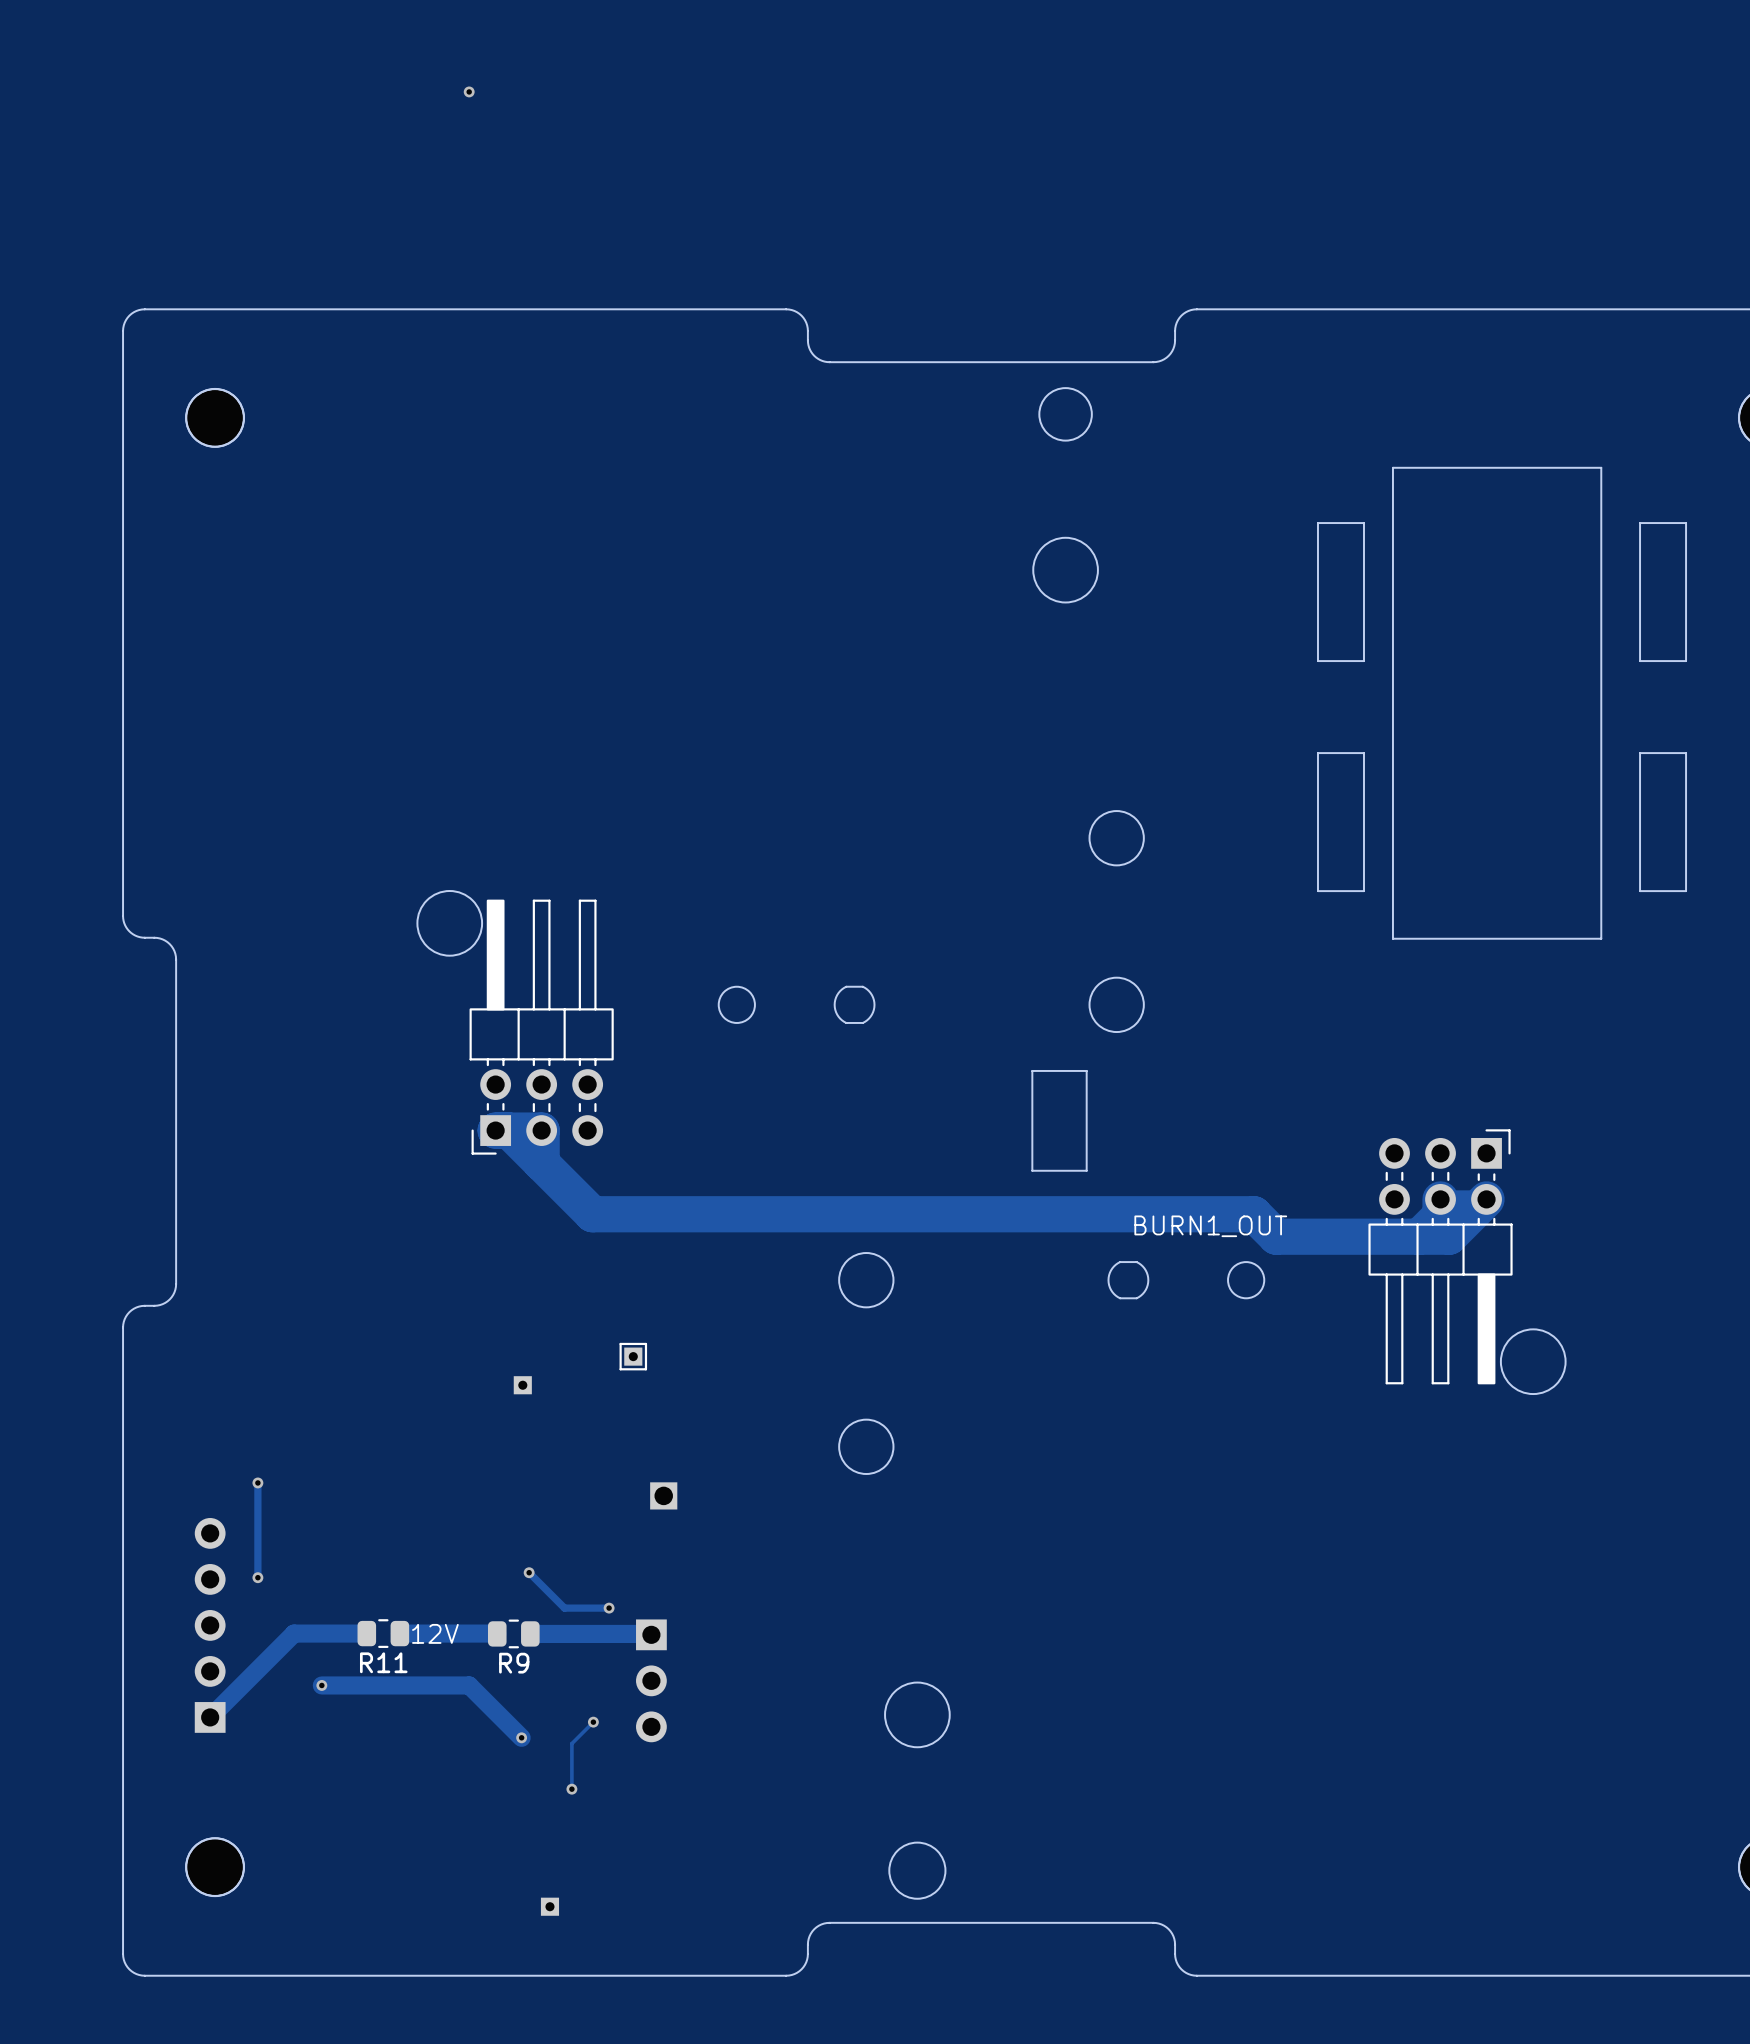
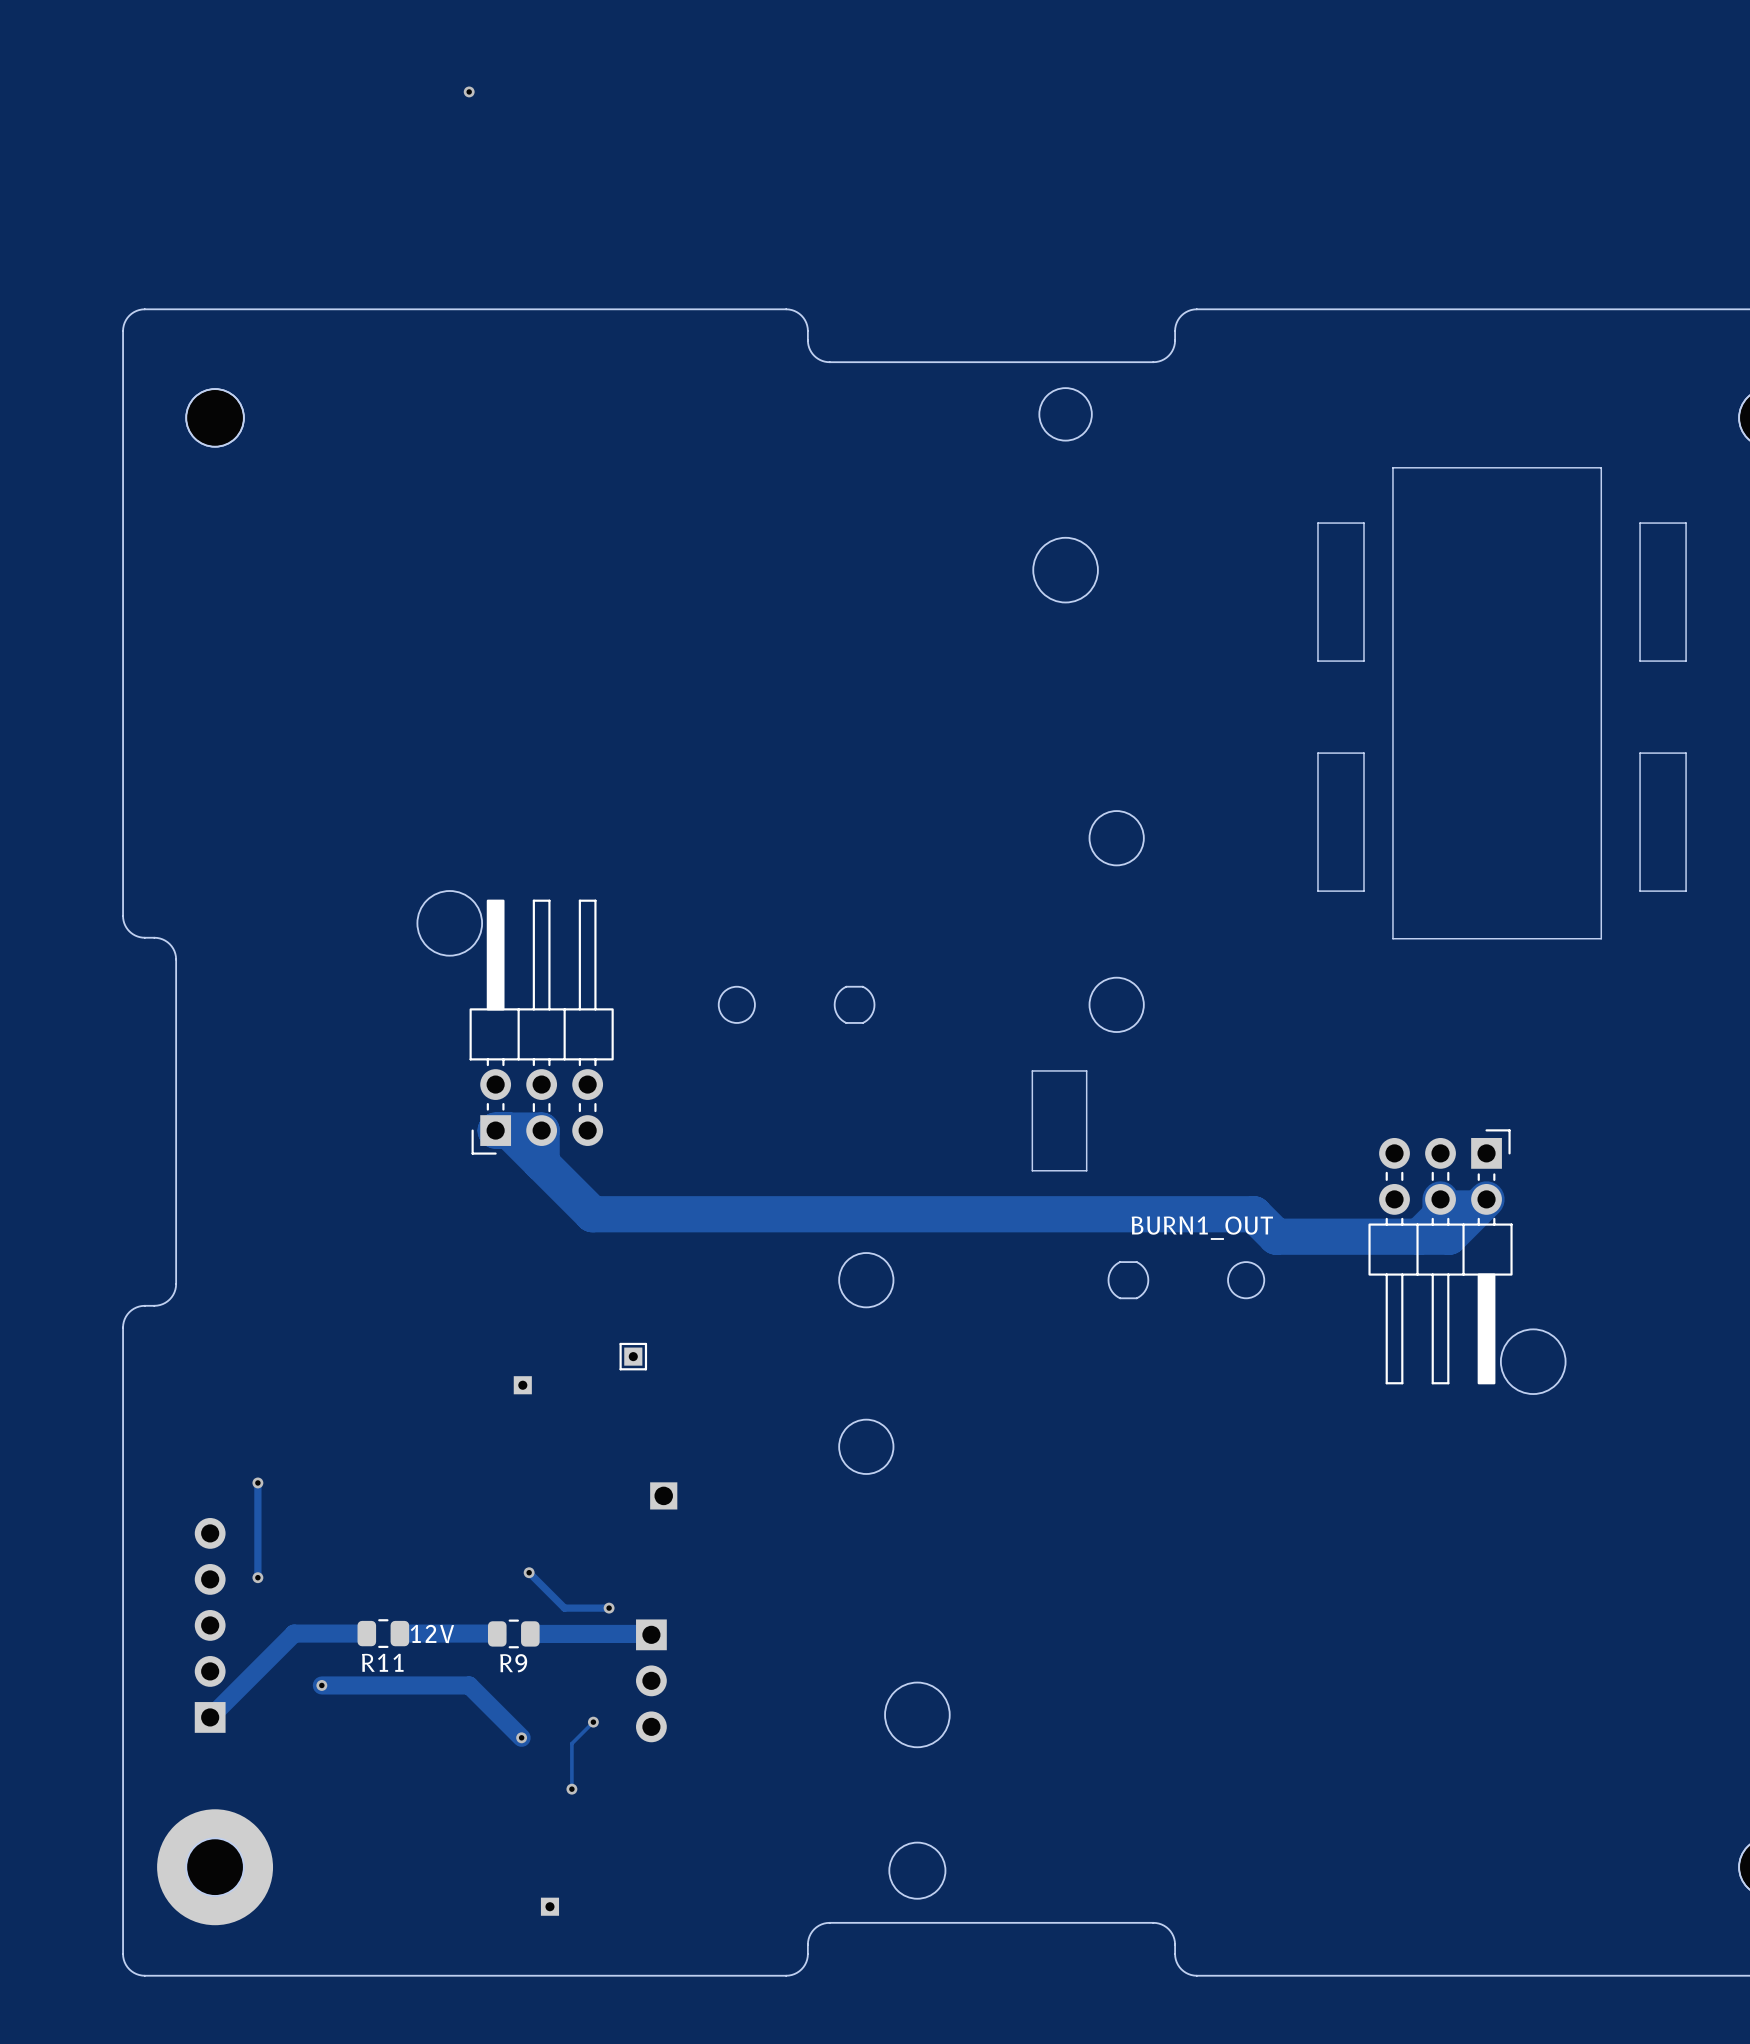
part footprint: [186, 1838, 245, 1897] -> [157, 1809, 274, 1926]

